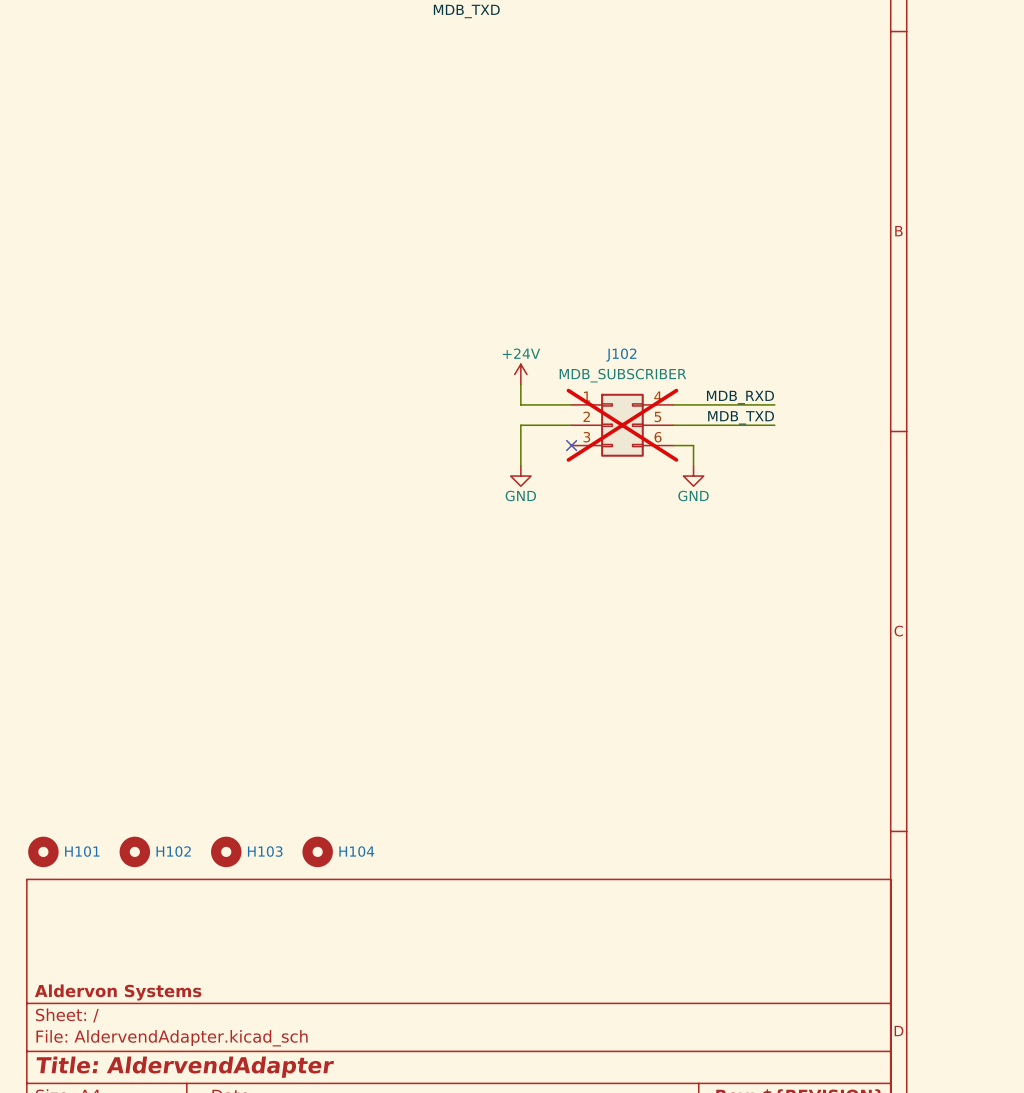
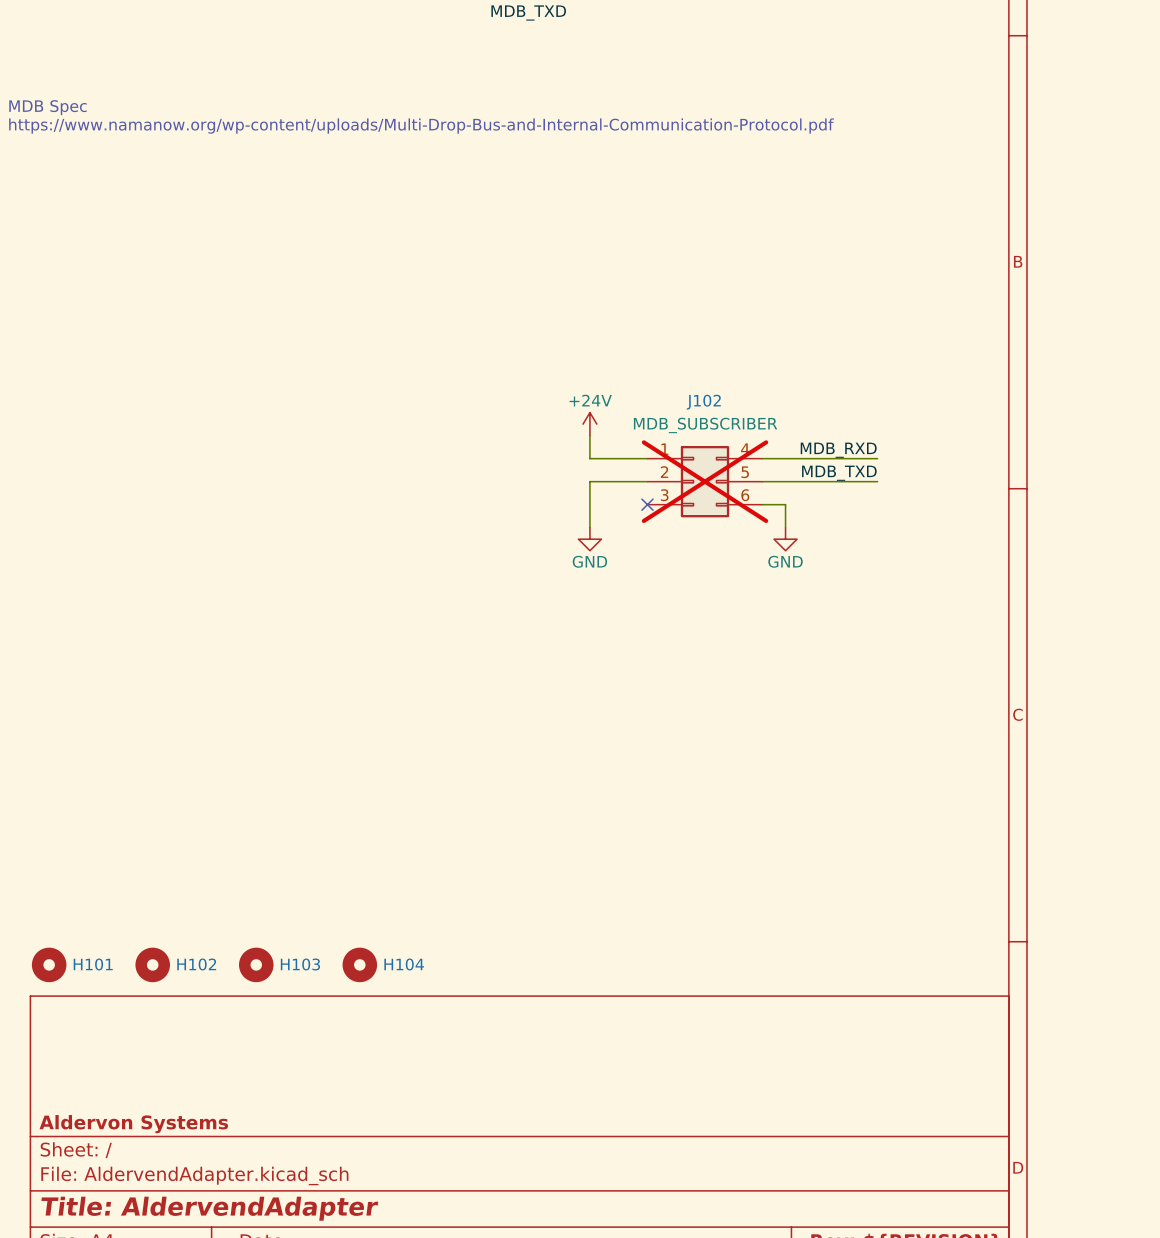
text: none -> MDB Spec (48, 107)
text: none -> https://www.namanow.org/wp-content/uploads/Multi-Drop-Bus-and-Internal-Communication-Protocol.pdf (421, 126)

